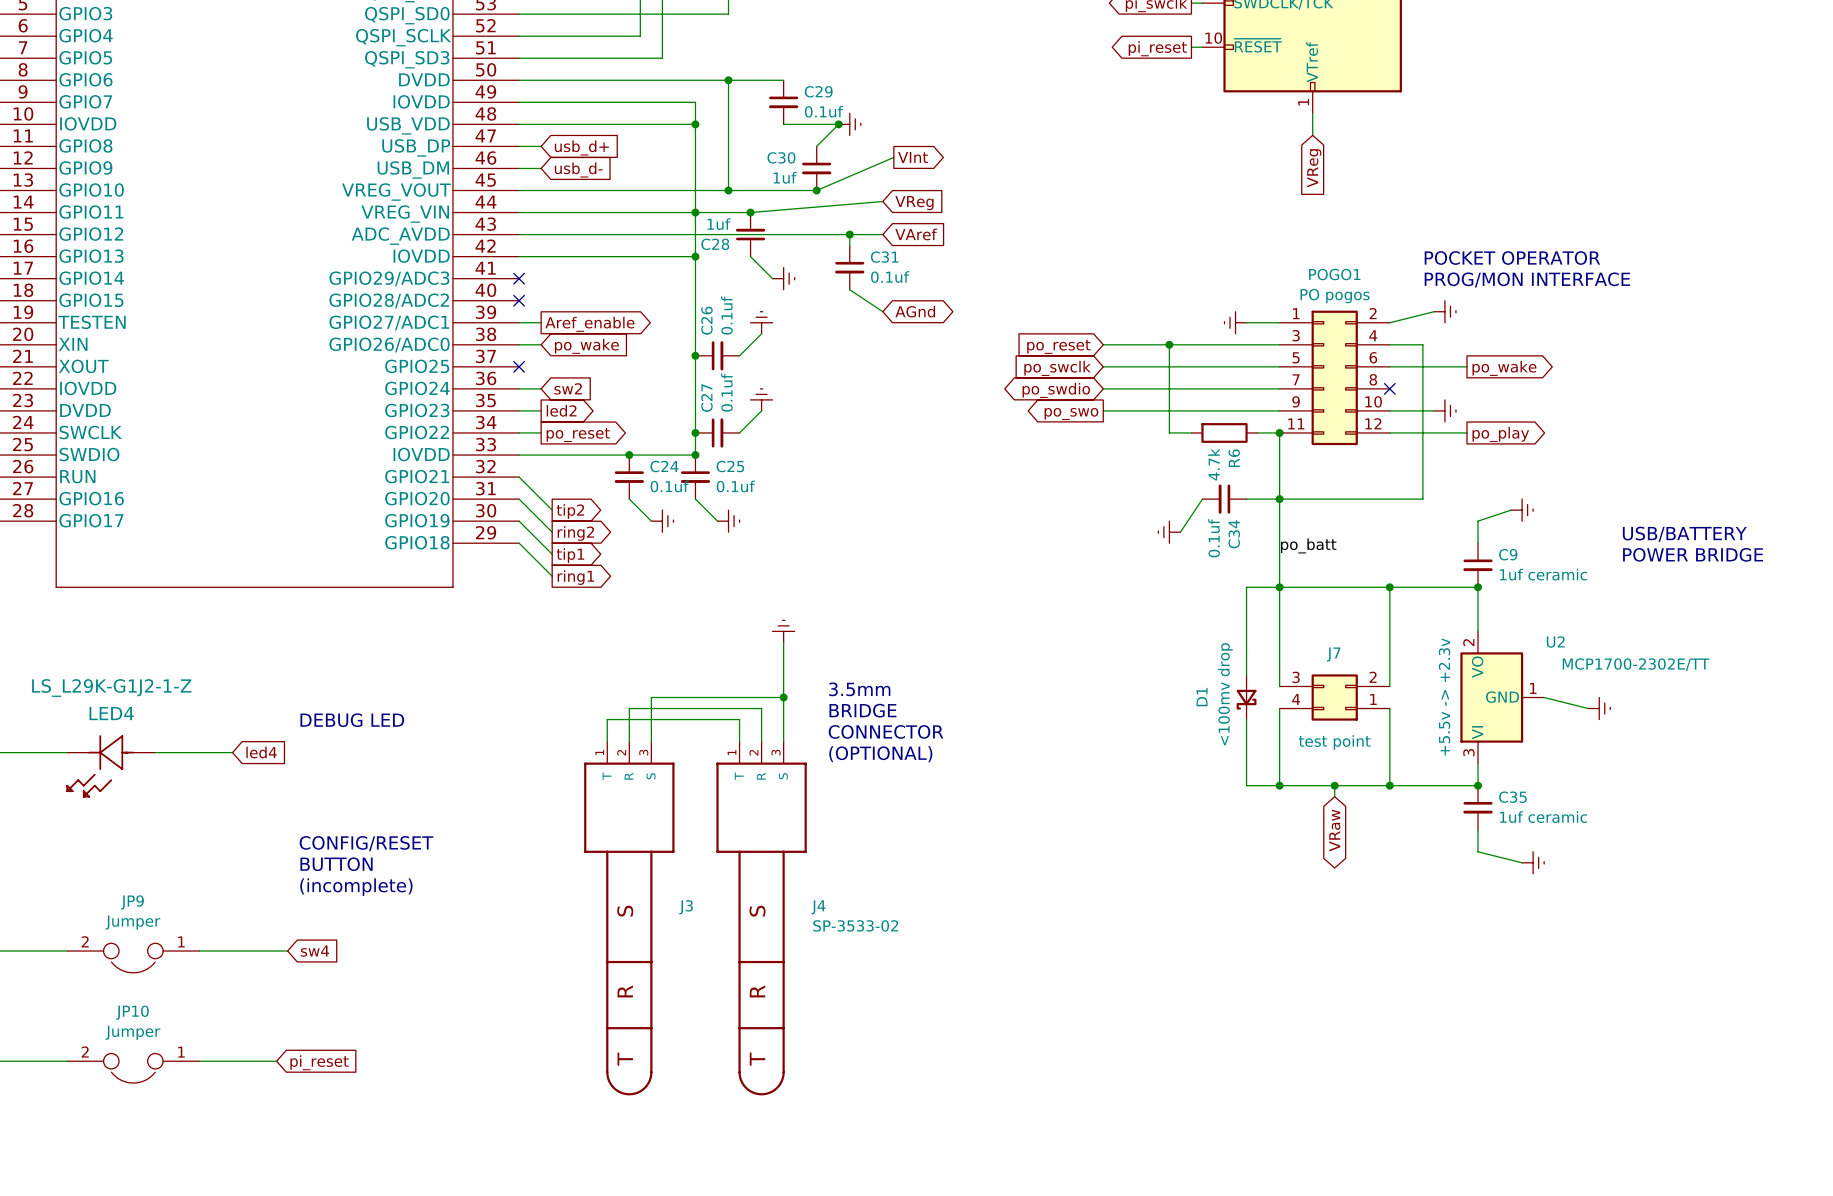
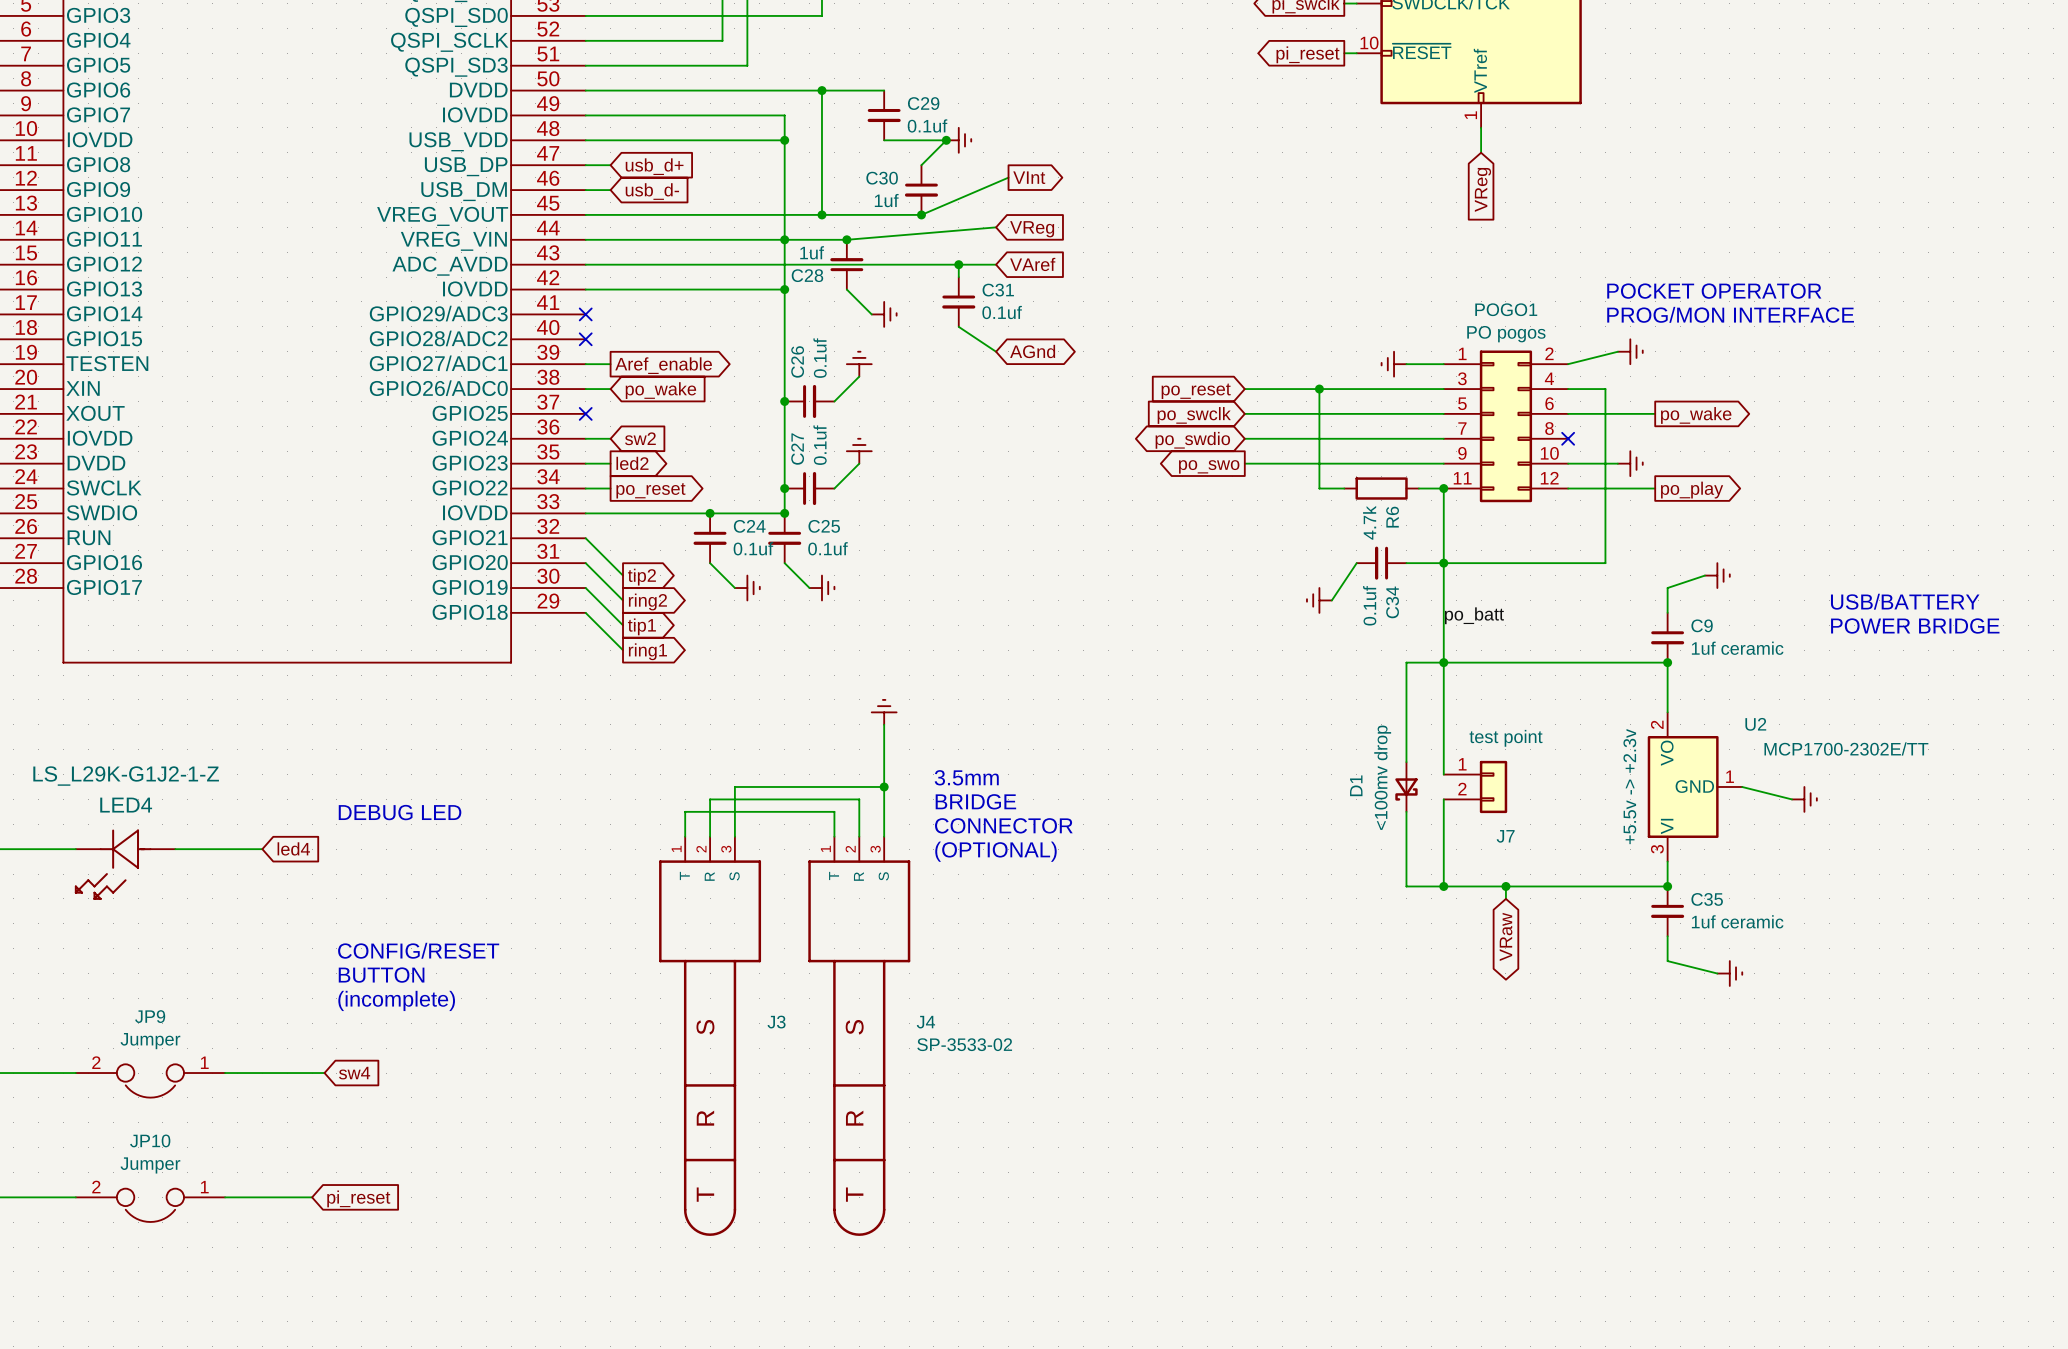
wire: (1389, 587) (1389, 686) -> none
junction: (1389, 587) -> none
J7 name position: J7 (1333, 654) -> J7 (1505, 836)
J7 symbol: [1279, 674, 1390, 721] -> [1443, 760, 1508, 814]
wire: (1389, 708) (1389, 785) -> none
J7 value position: test point (1334, 742) -> test point (1506, 738)
junction: (1389, 785) -> none

